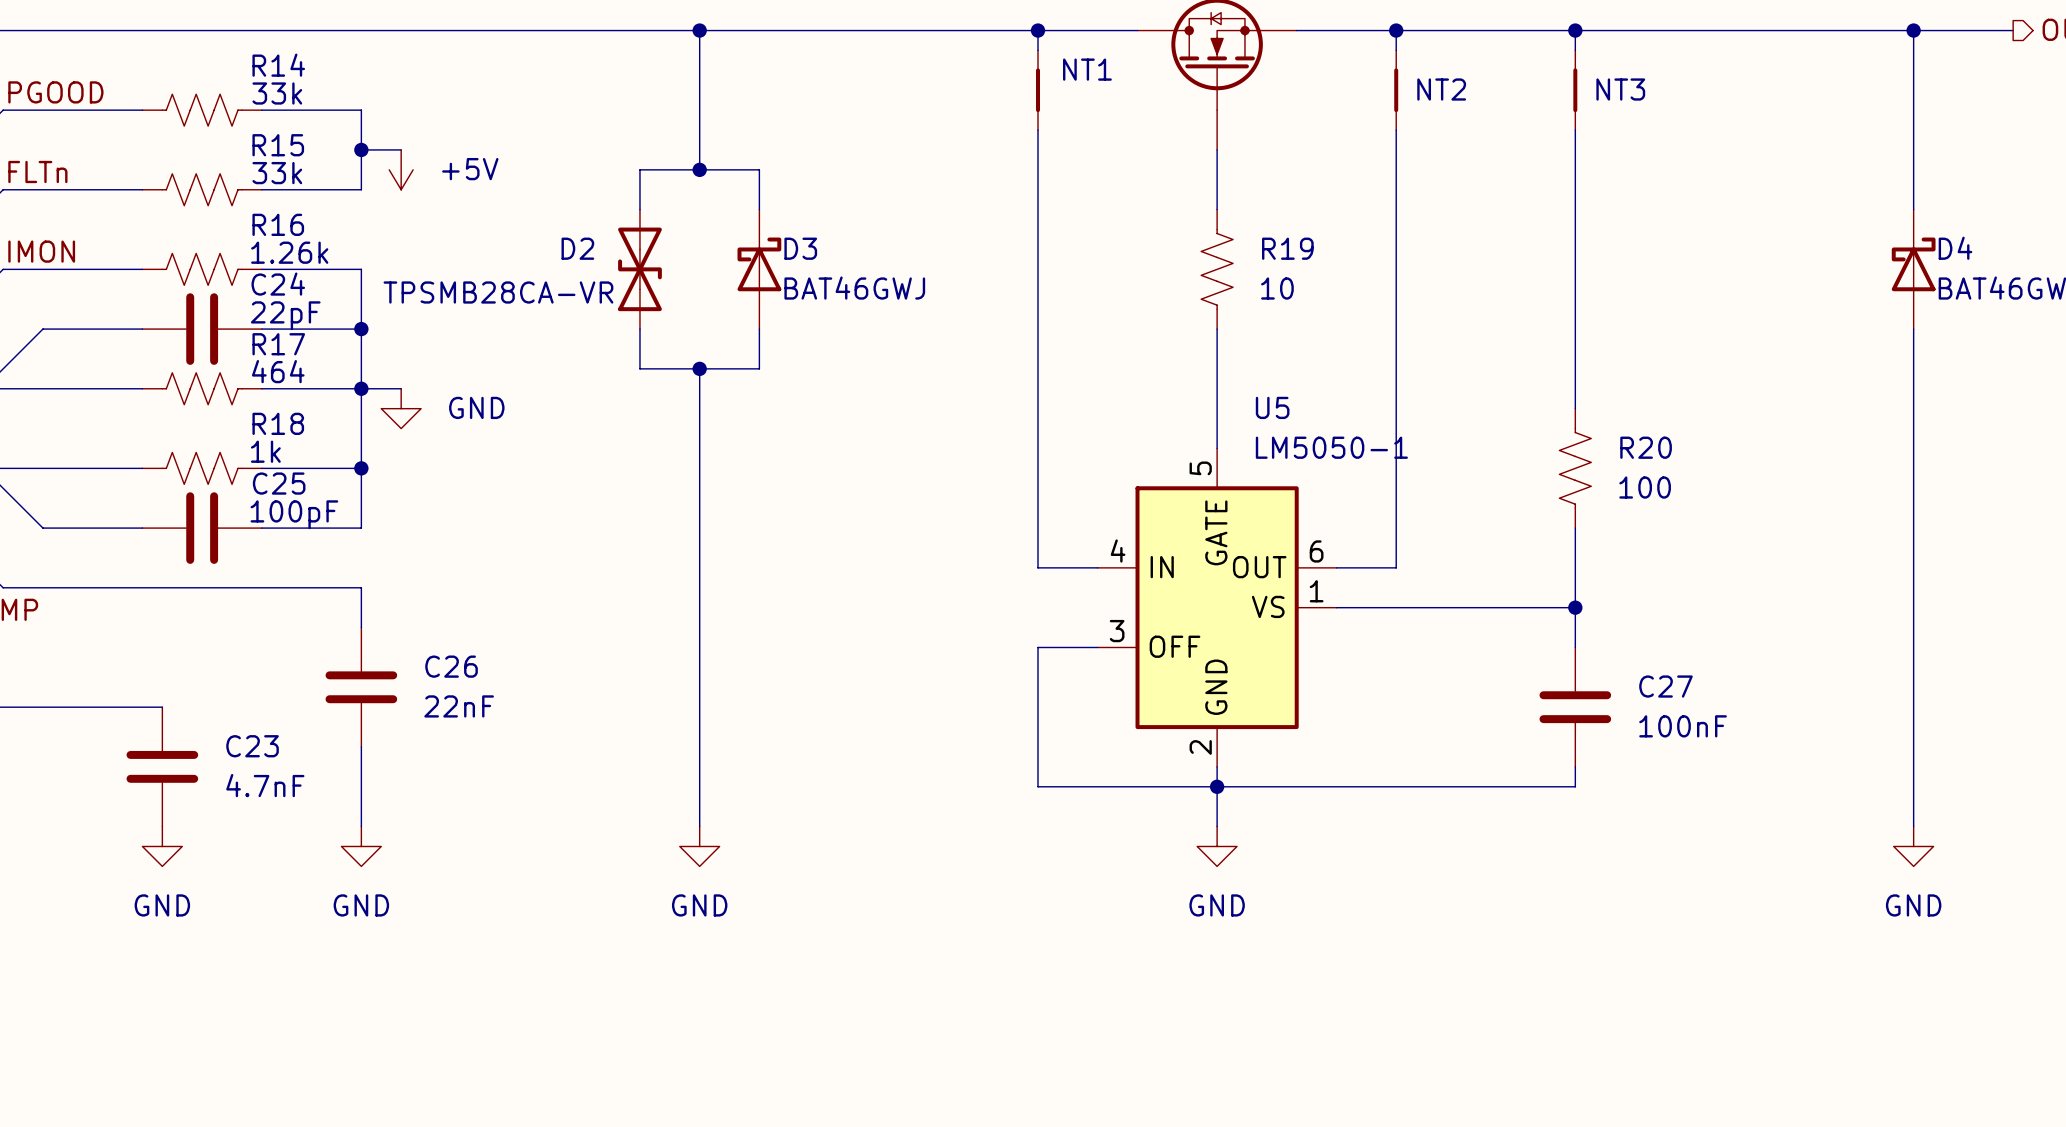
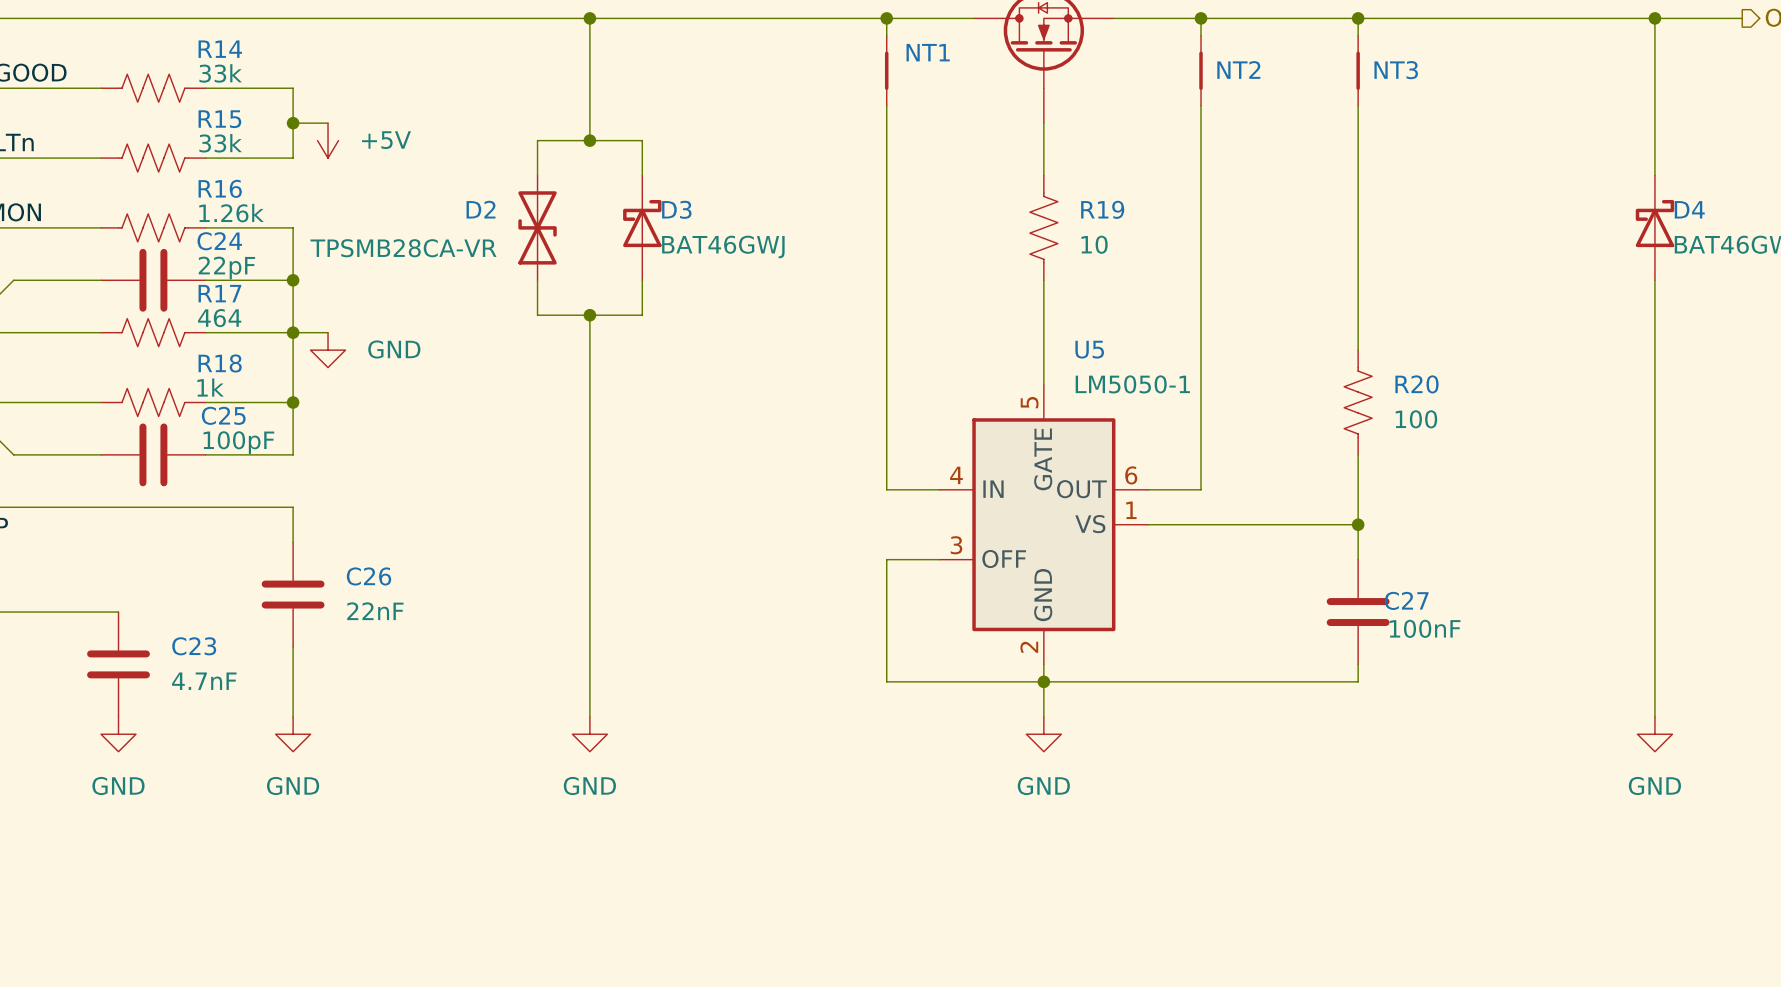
C27 name position: C27 (1665, 686) -> C27 (1406, 600)
C27 value position: 100nF (1683, 726) -> 100nF (1425, 628)

